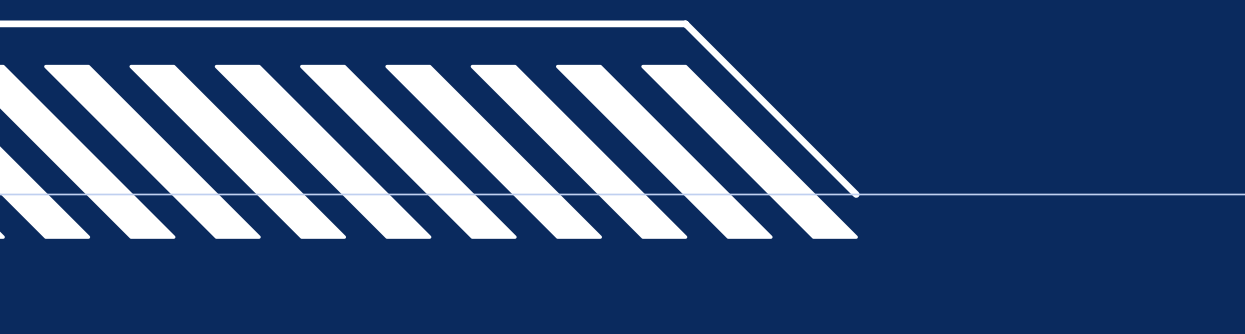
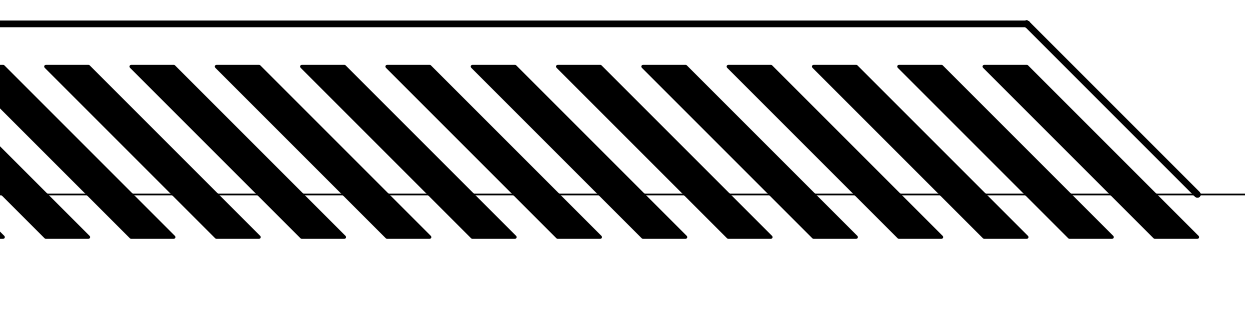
line: (685, 23) (856, 194) -> (685, 23) (1026, 23) (1197, 194)
drawing: none -> [726, 64, 1200, 239]

